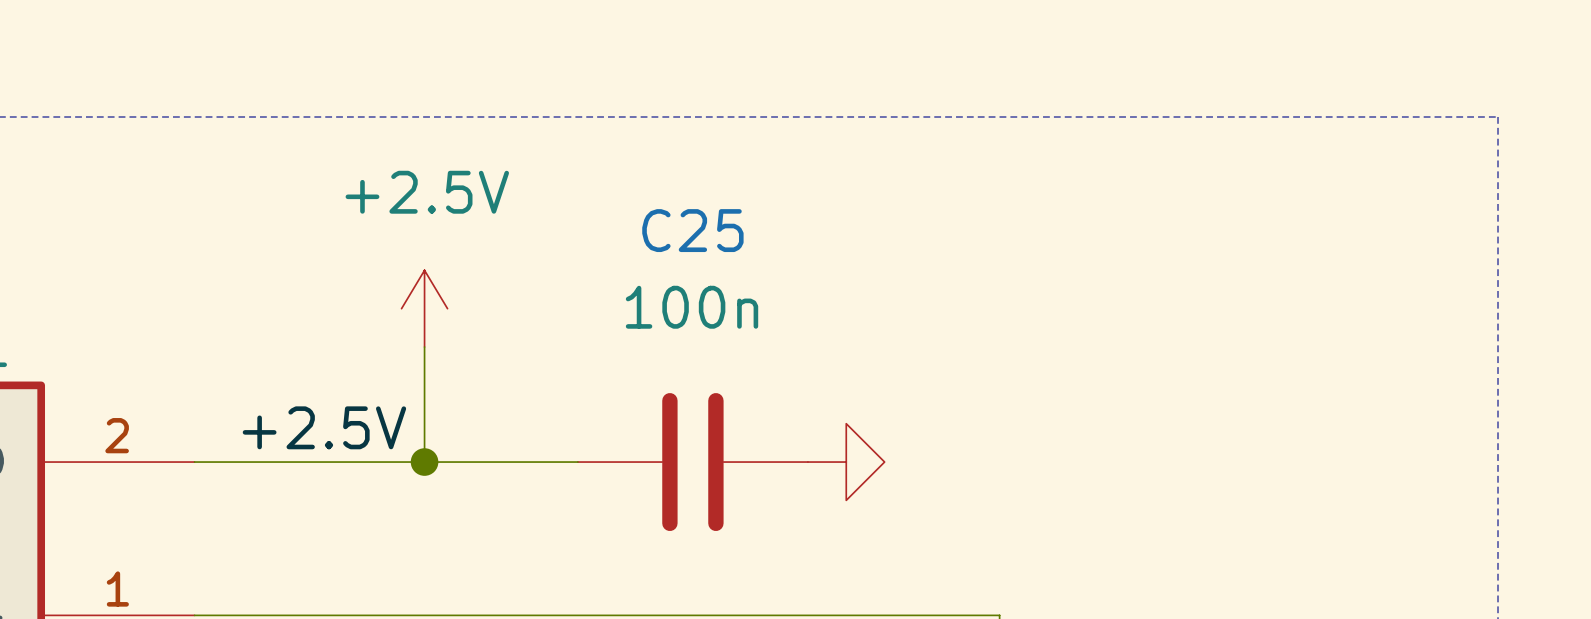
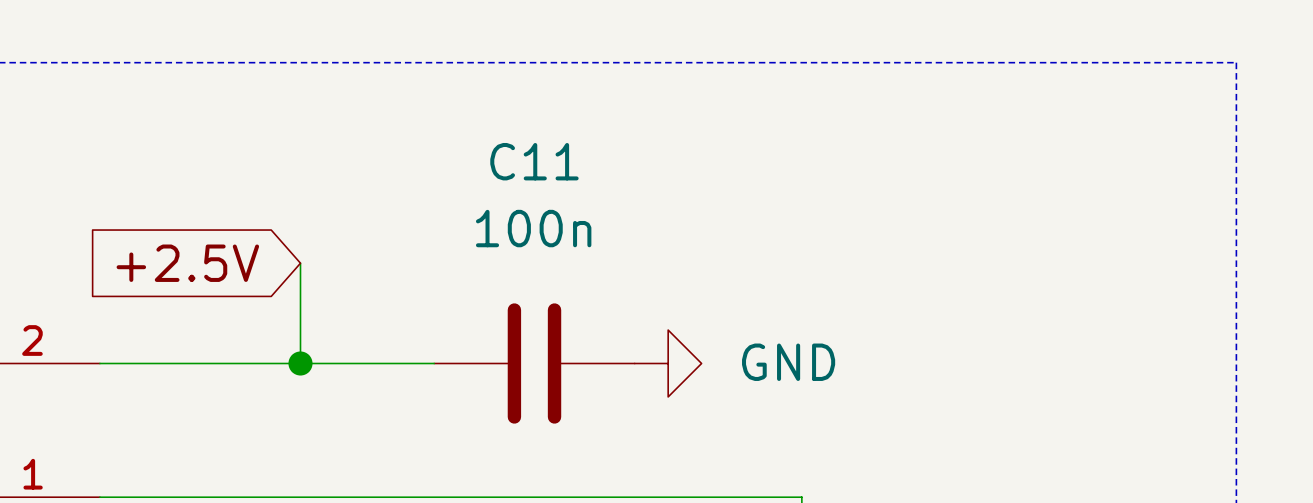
C25 name: C25 (692, 230) -> C11 (534, 161)
power symbol: +2.5V (424, 308) -> none
global label: none -> +2.5V (187, 263)
label: +2.5V (324, 427) -> none
power symbol text: none -> GND (788, 362)

